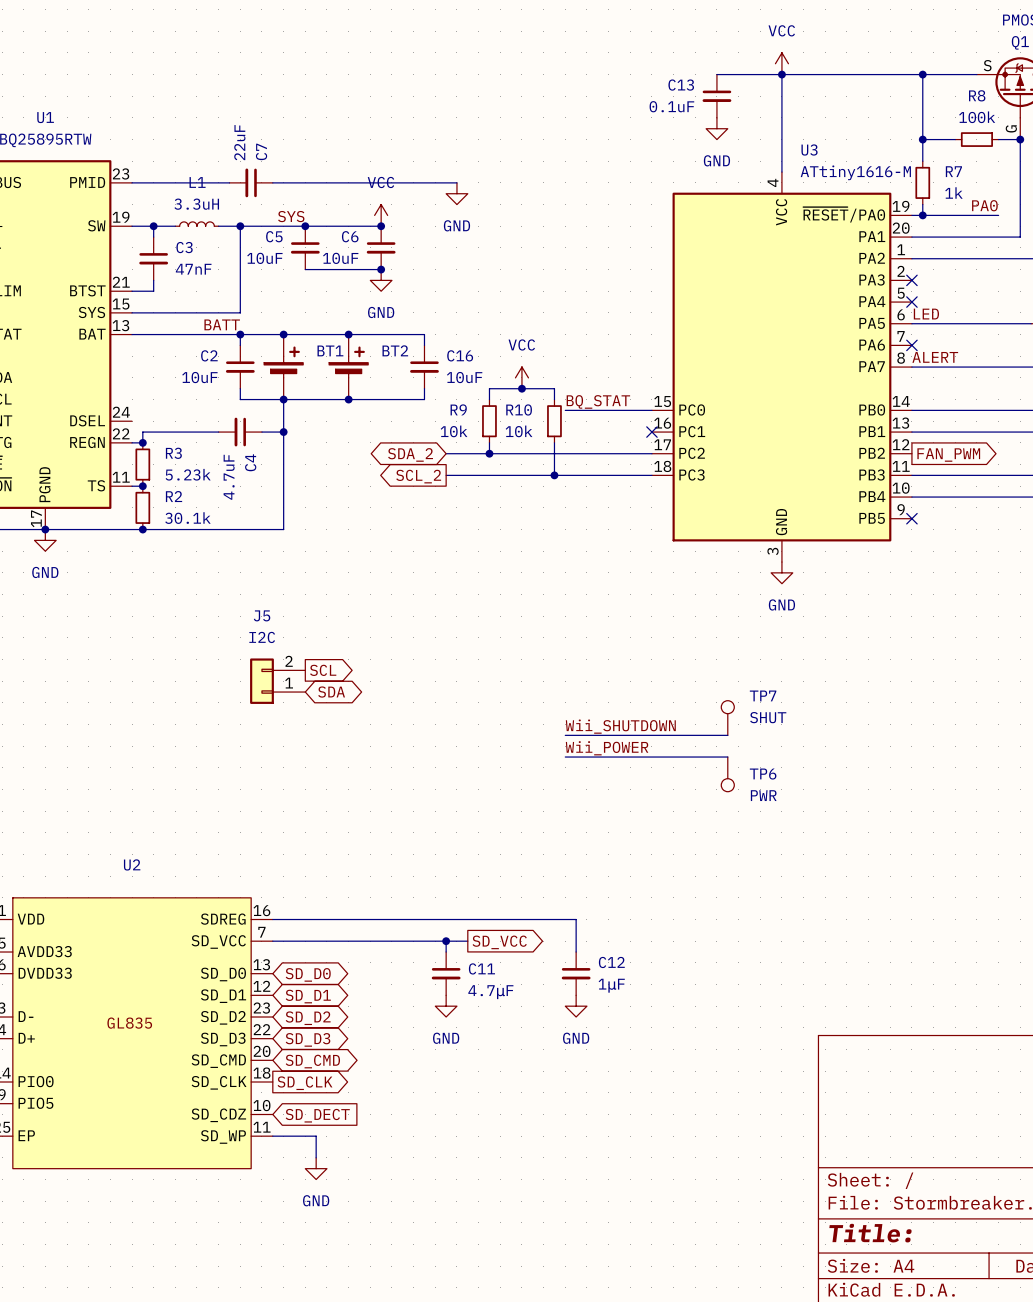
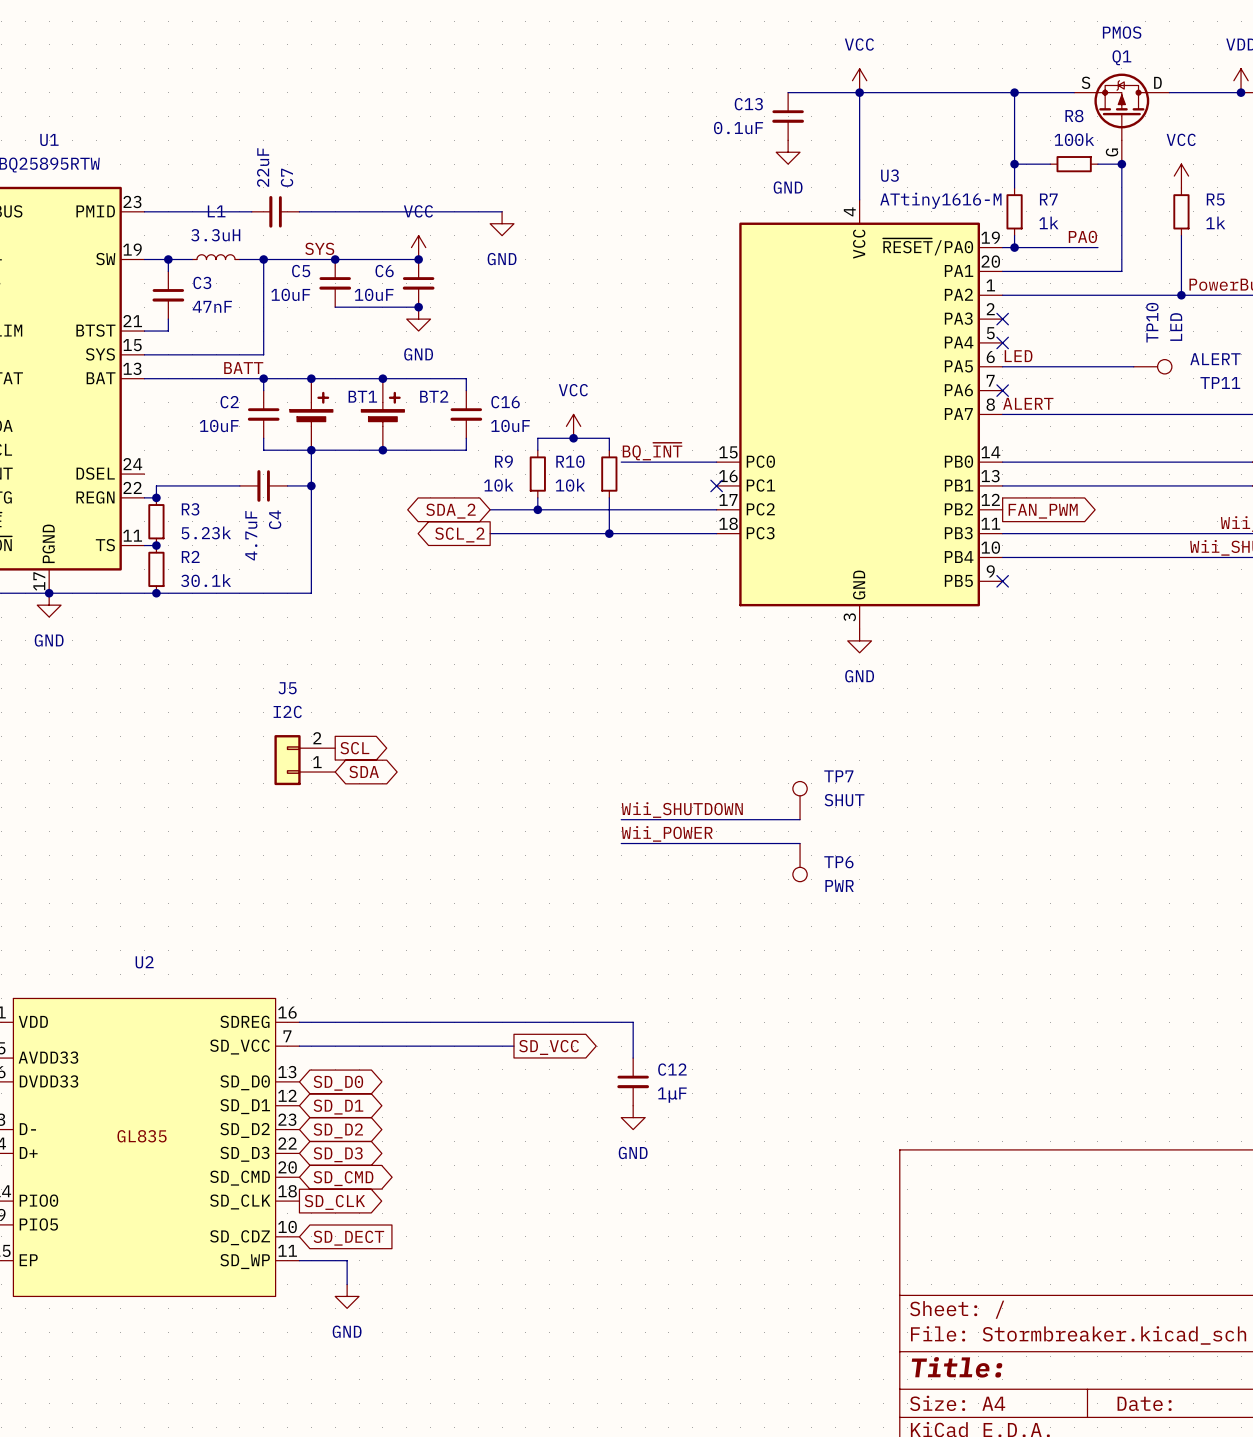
label: BQ_STAT (598, 401) -> BQ_~{INT} (652, 451)
wire: (446, 941) (446, 952) -> none
junction: (446, 941) -> none
C11: 4.7μF (446, 973) -> none
power symbol: GND (446, 1006) -> none

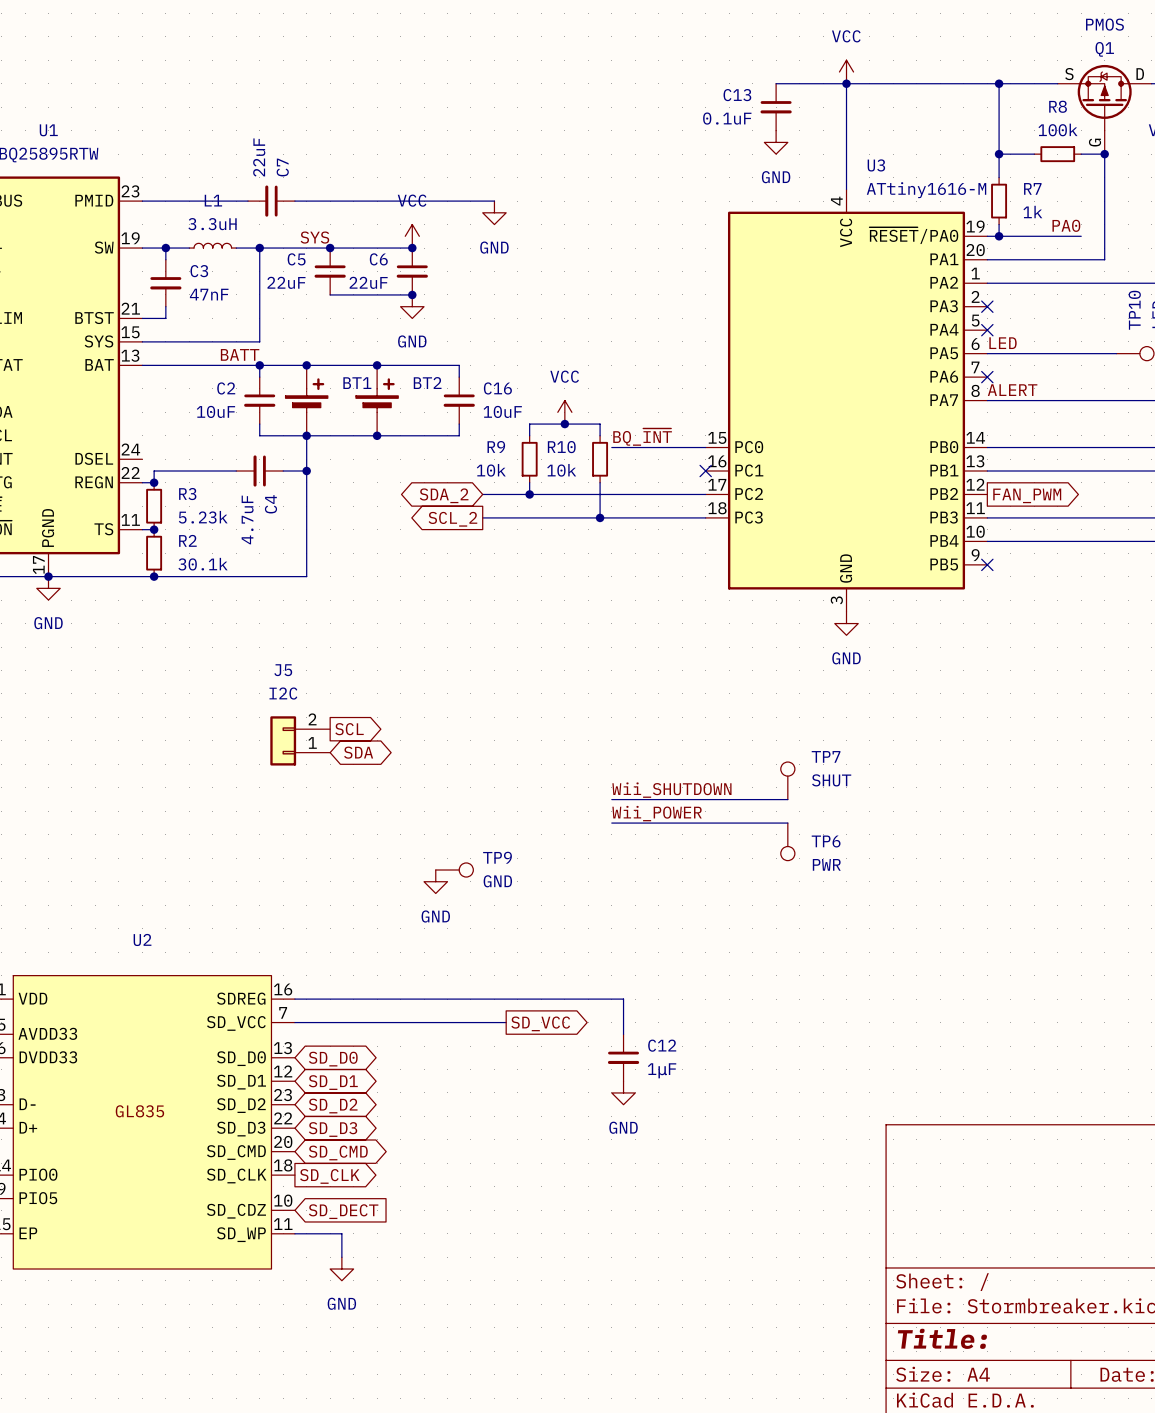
C5 value: 10uF (290, 294) -> 22uF (286, 282)
C6 value: 10uF (374, 294) -> 22uF (368, 282)
TP9: none -> GND (454, 870)
power symbol: none -> GND (435, 881)

